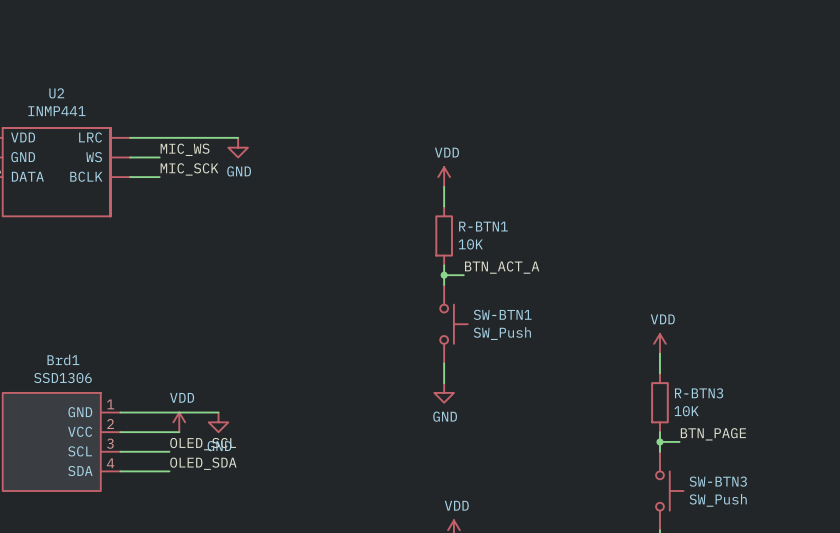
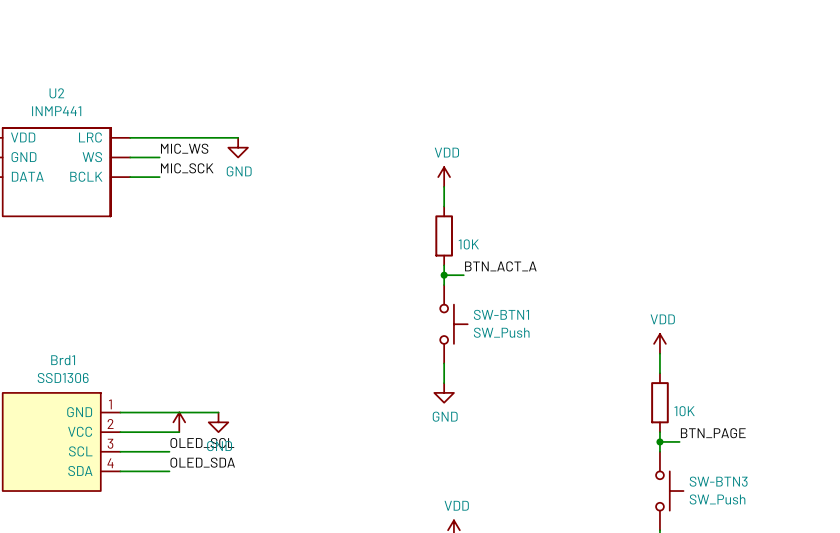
R-BTN1 name: R-BTN1 (483, 226) -> none
R-BTN3 name: R-BTN3 (699, 393) -> none
power symbol text: VDD (182, 397) -> none

